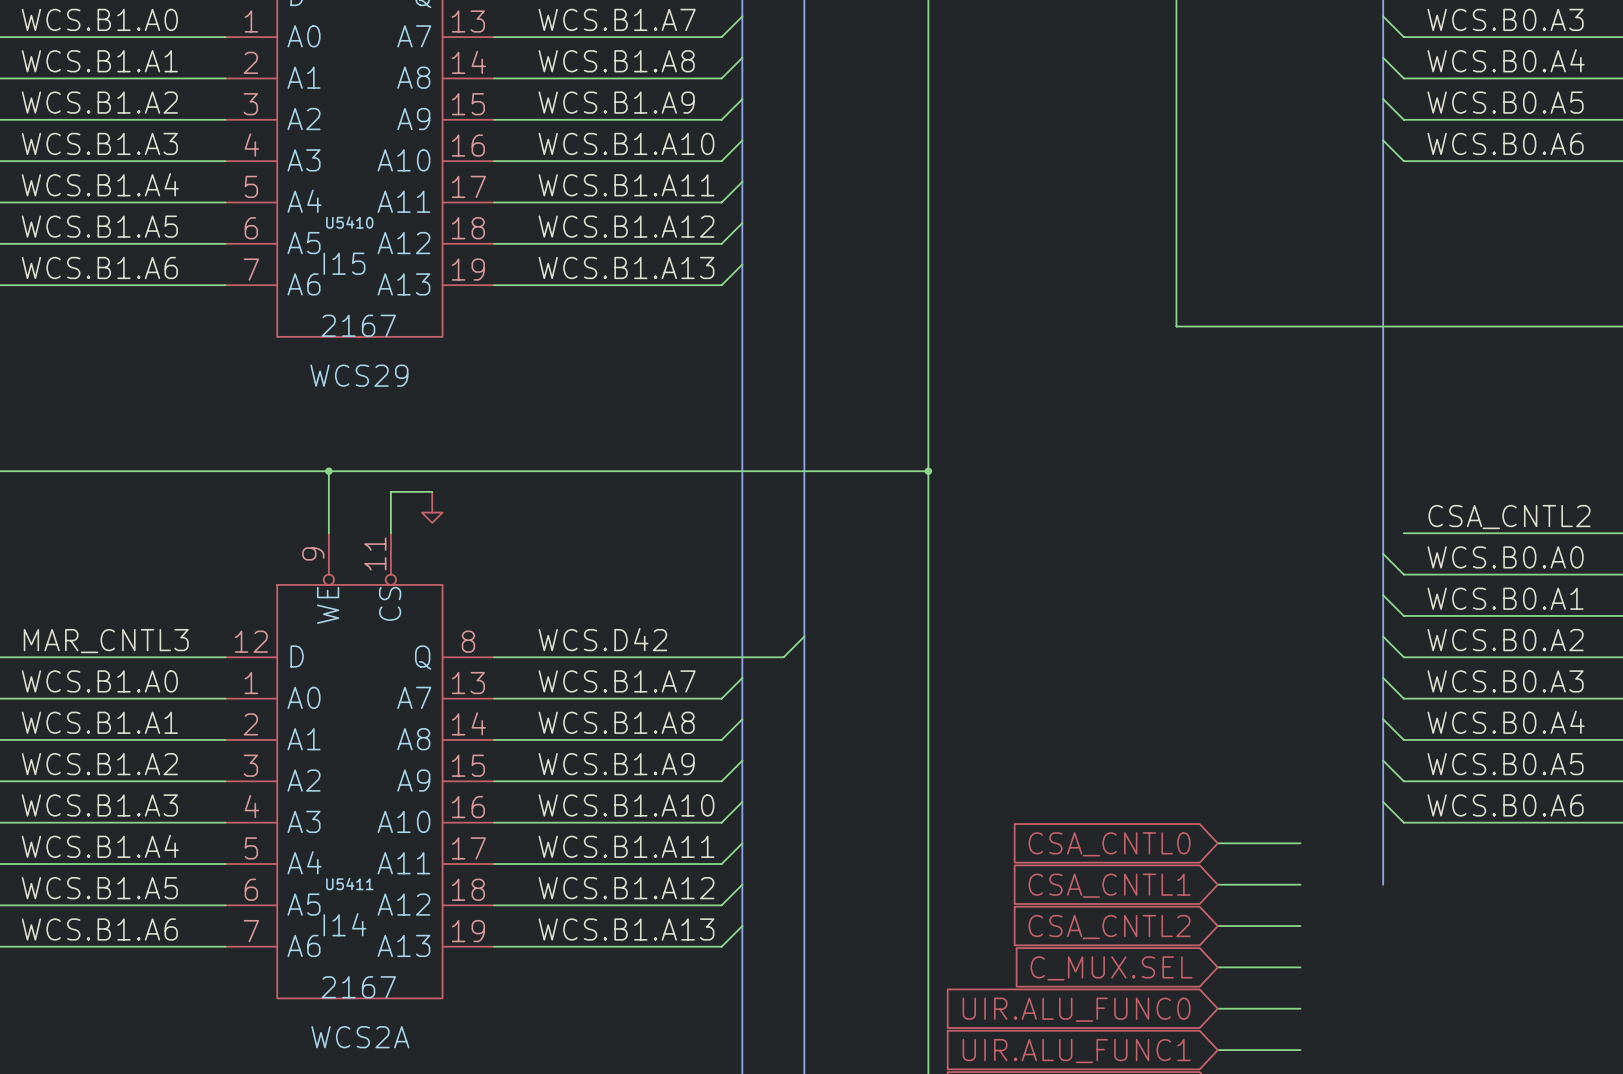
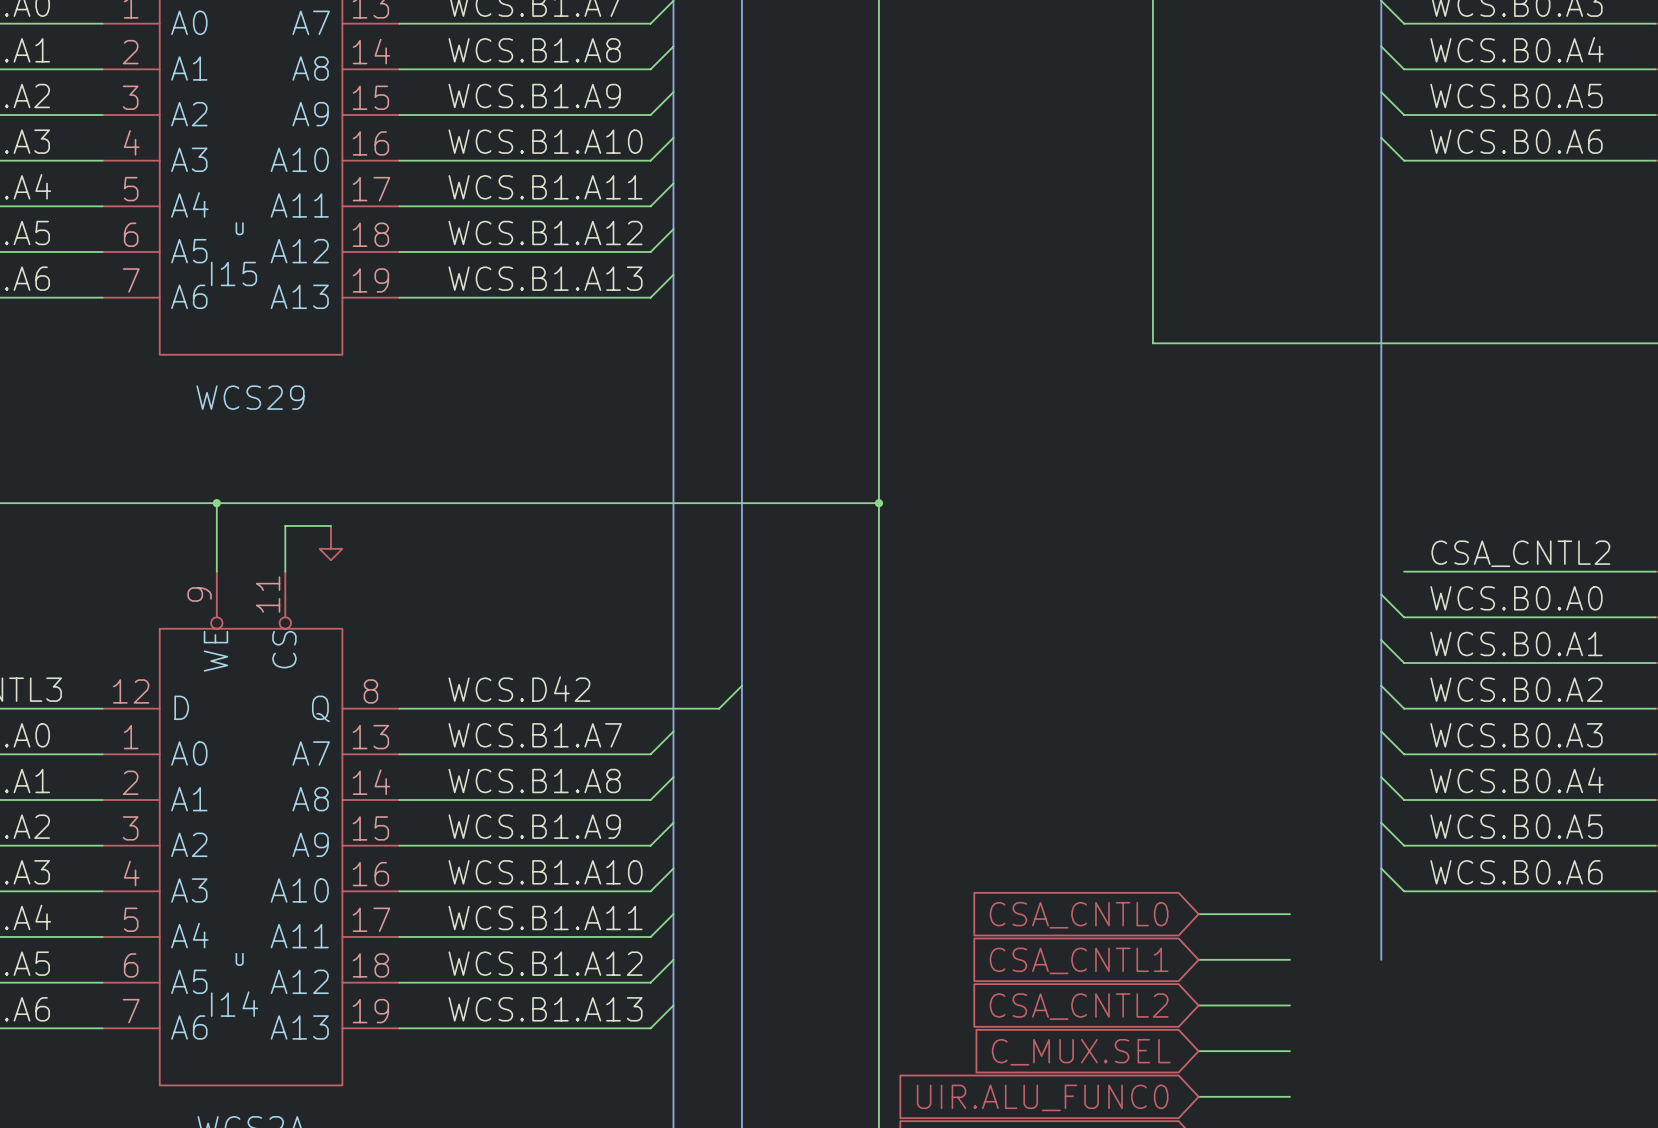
U5410 name: U5410 (349, 222) -> U (239, 228)
U5410 value: 2167 (358, 325) -> none
U5411 name: U5411 (349, 884) -> U (239, 959)
U5411 value: 2167 (358, 987) -> none

